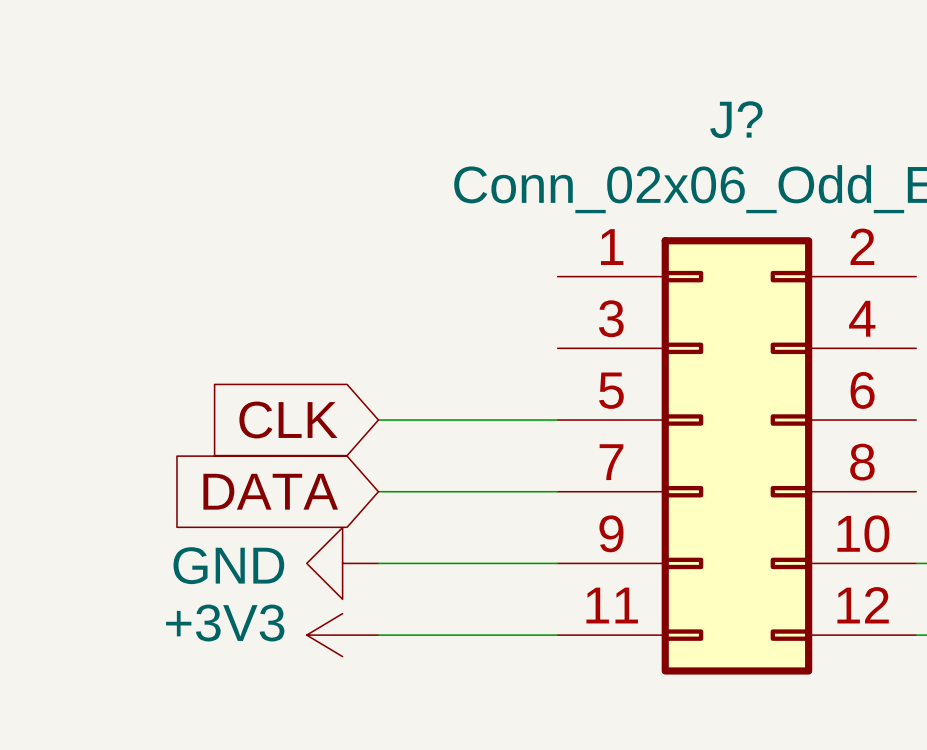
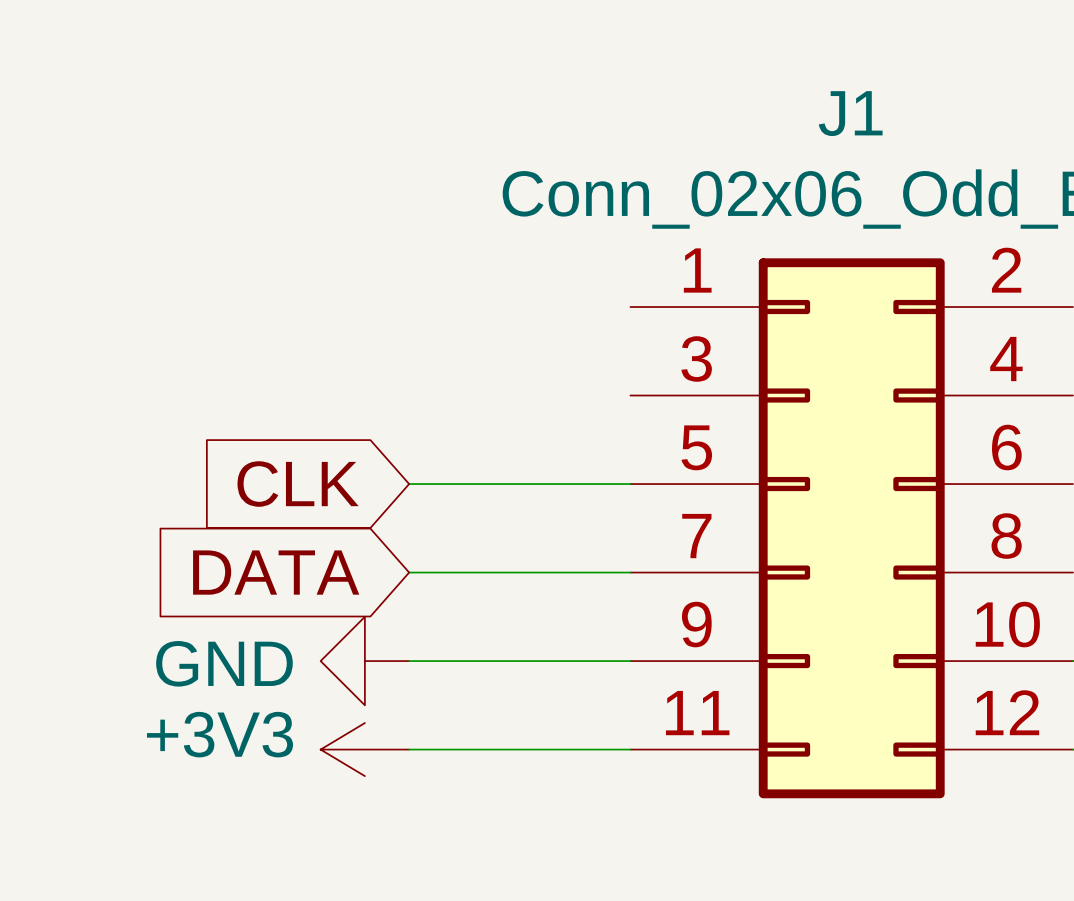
J? name: J? (736, 119) -> J1 (850, 113)

